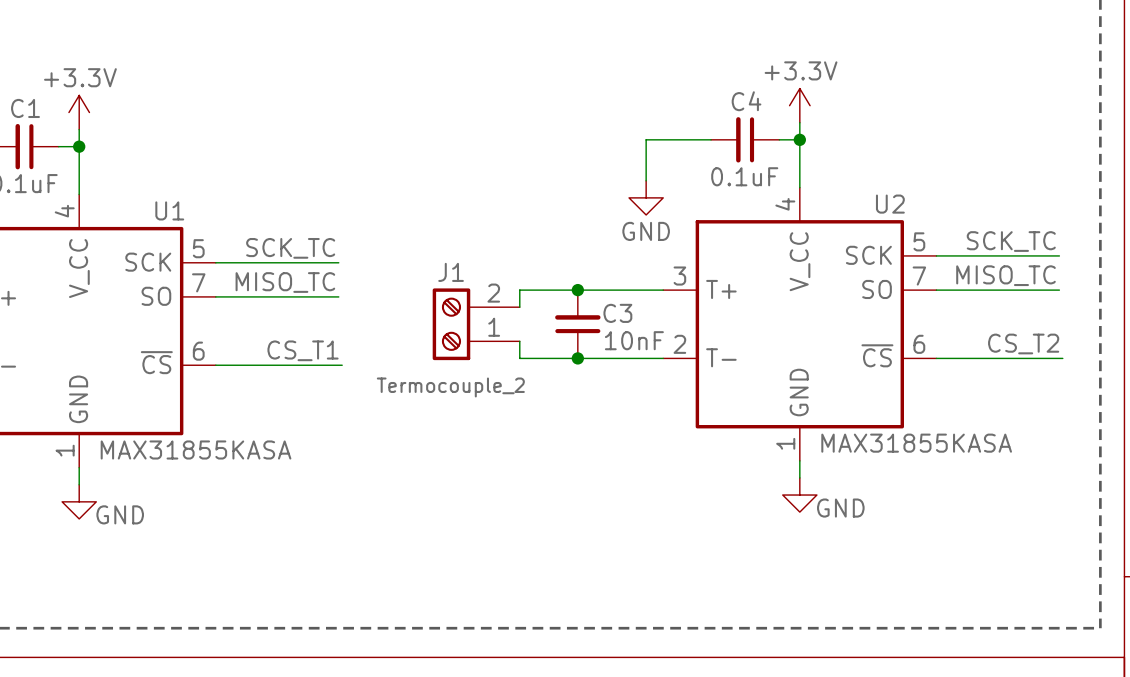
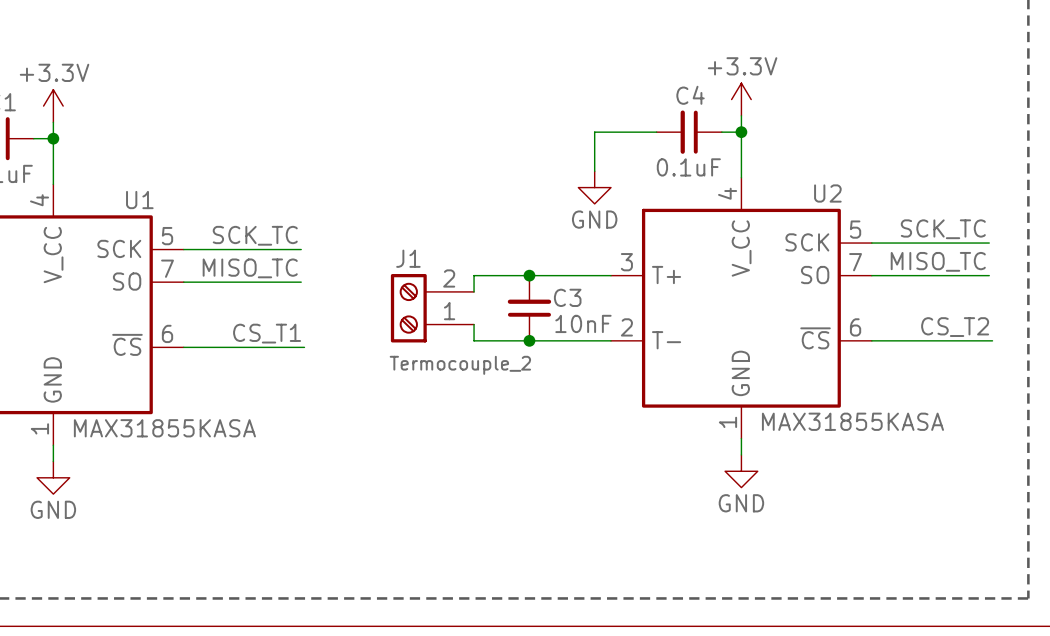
J1 value position: Termocouple_2 (450, 387) -> Termocouple_2 (460, 365)
power symbol text position: GND (840, 508) -> GND (741, 503)
power symbol text position: GND (120, 514) -> GND (53, 509)

